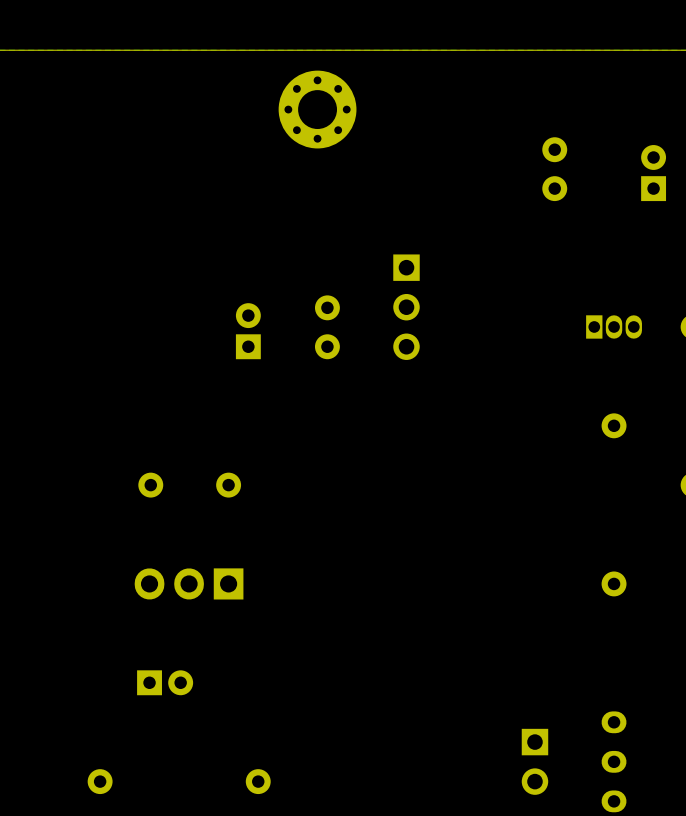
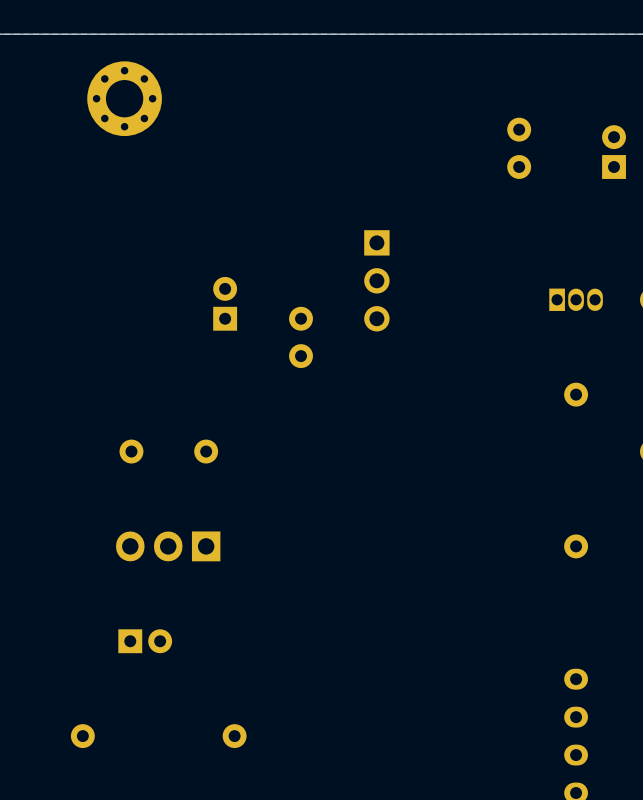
part position: (317, 109) -> (124, 98)
part position: (327, 327) -> (301, 337)
part: (534, 761) -> none

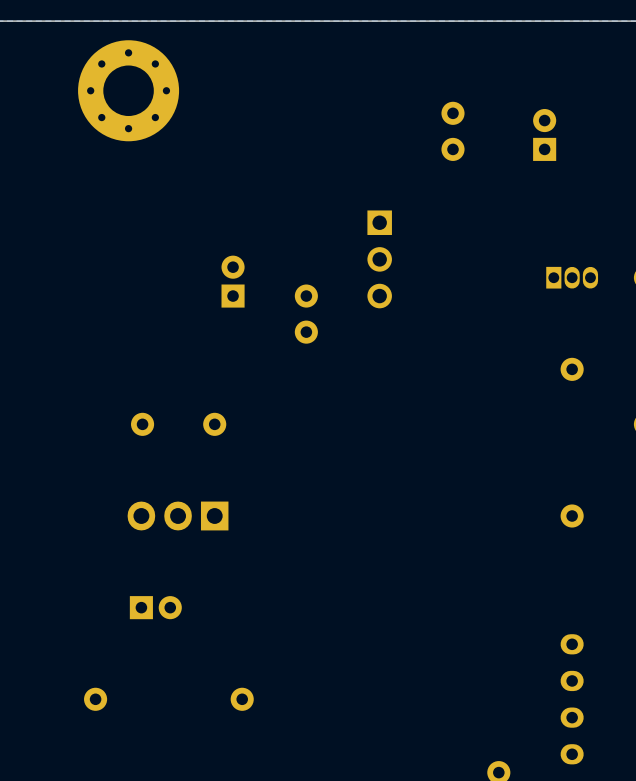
part footprint: [87, 61, 162, 137] -> [78, 40, 180, 142]
part position: (519, 148) -> (453, 131)
part position: (614, 152) -> (544, 134)

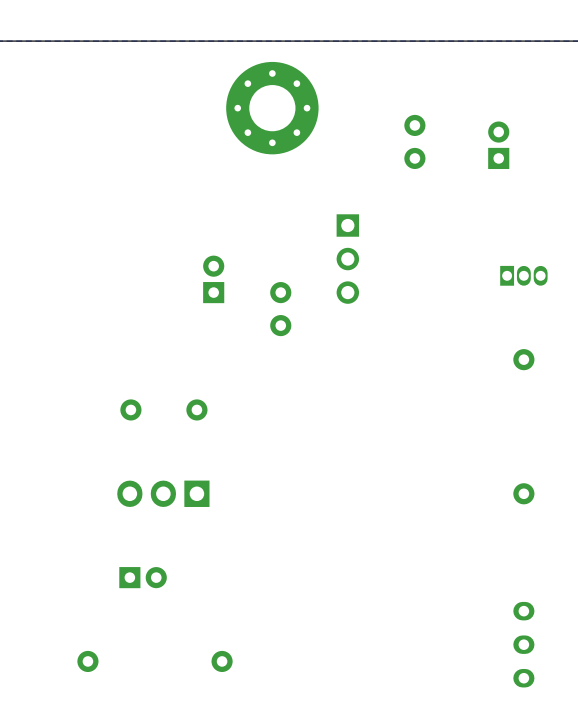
part position: (128, 90) -> (272, 108)

